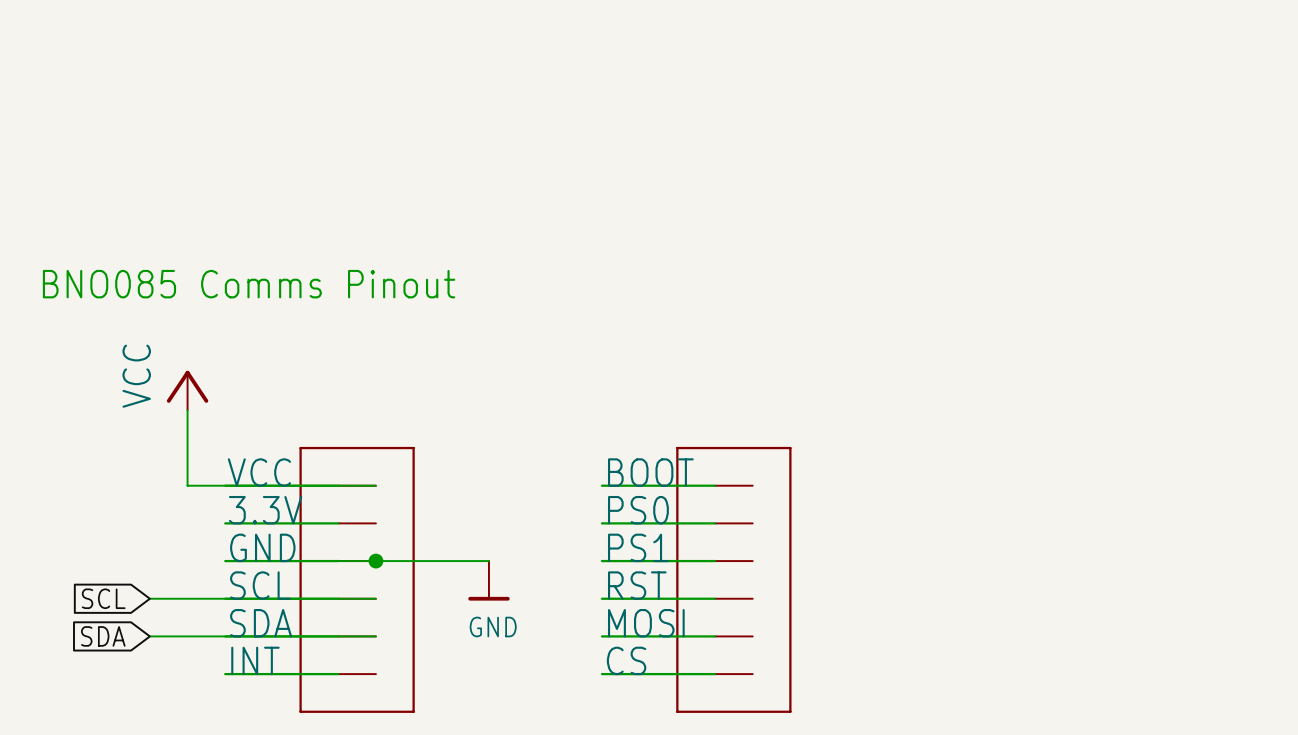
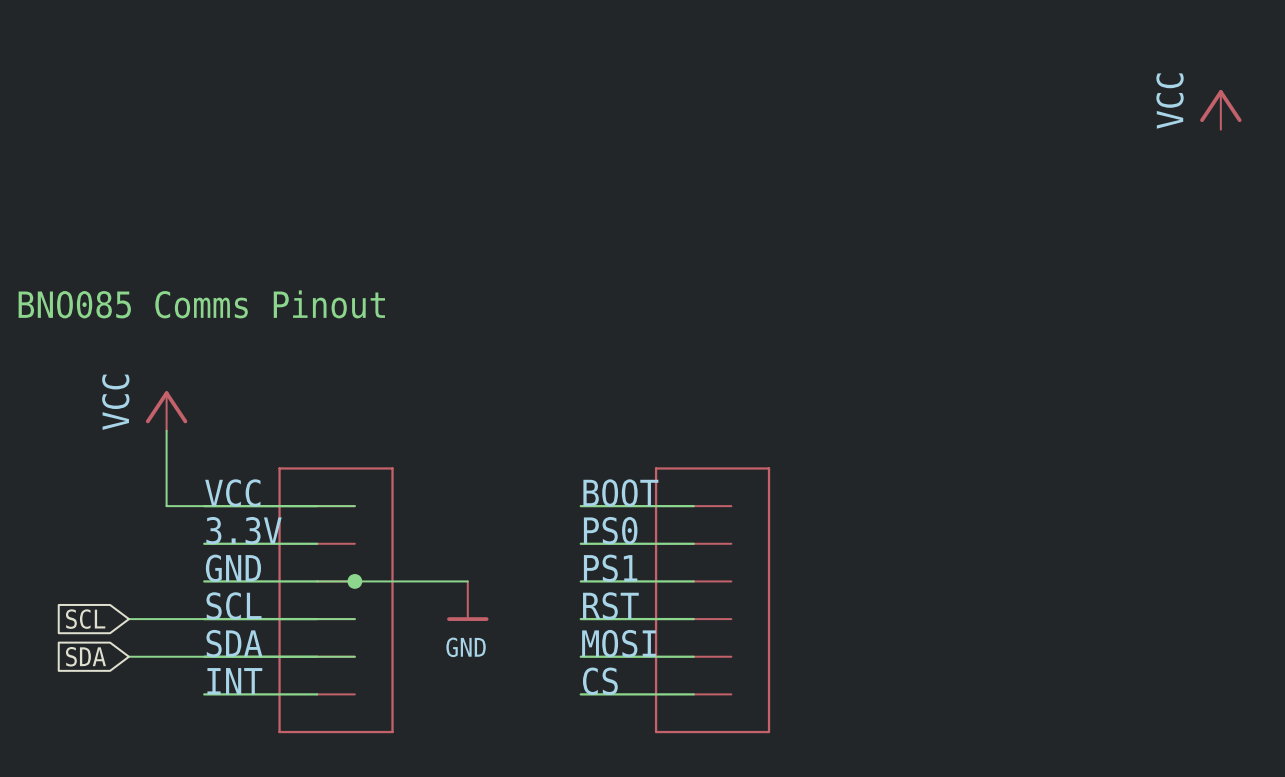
power symbol: none -> VCC (1220, 109)

